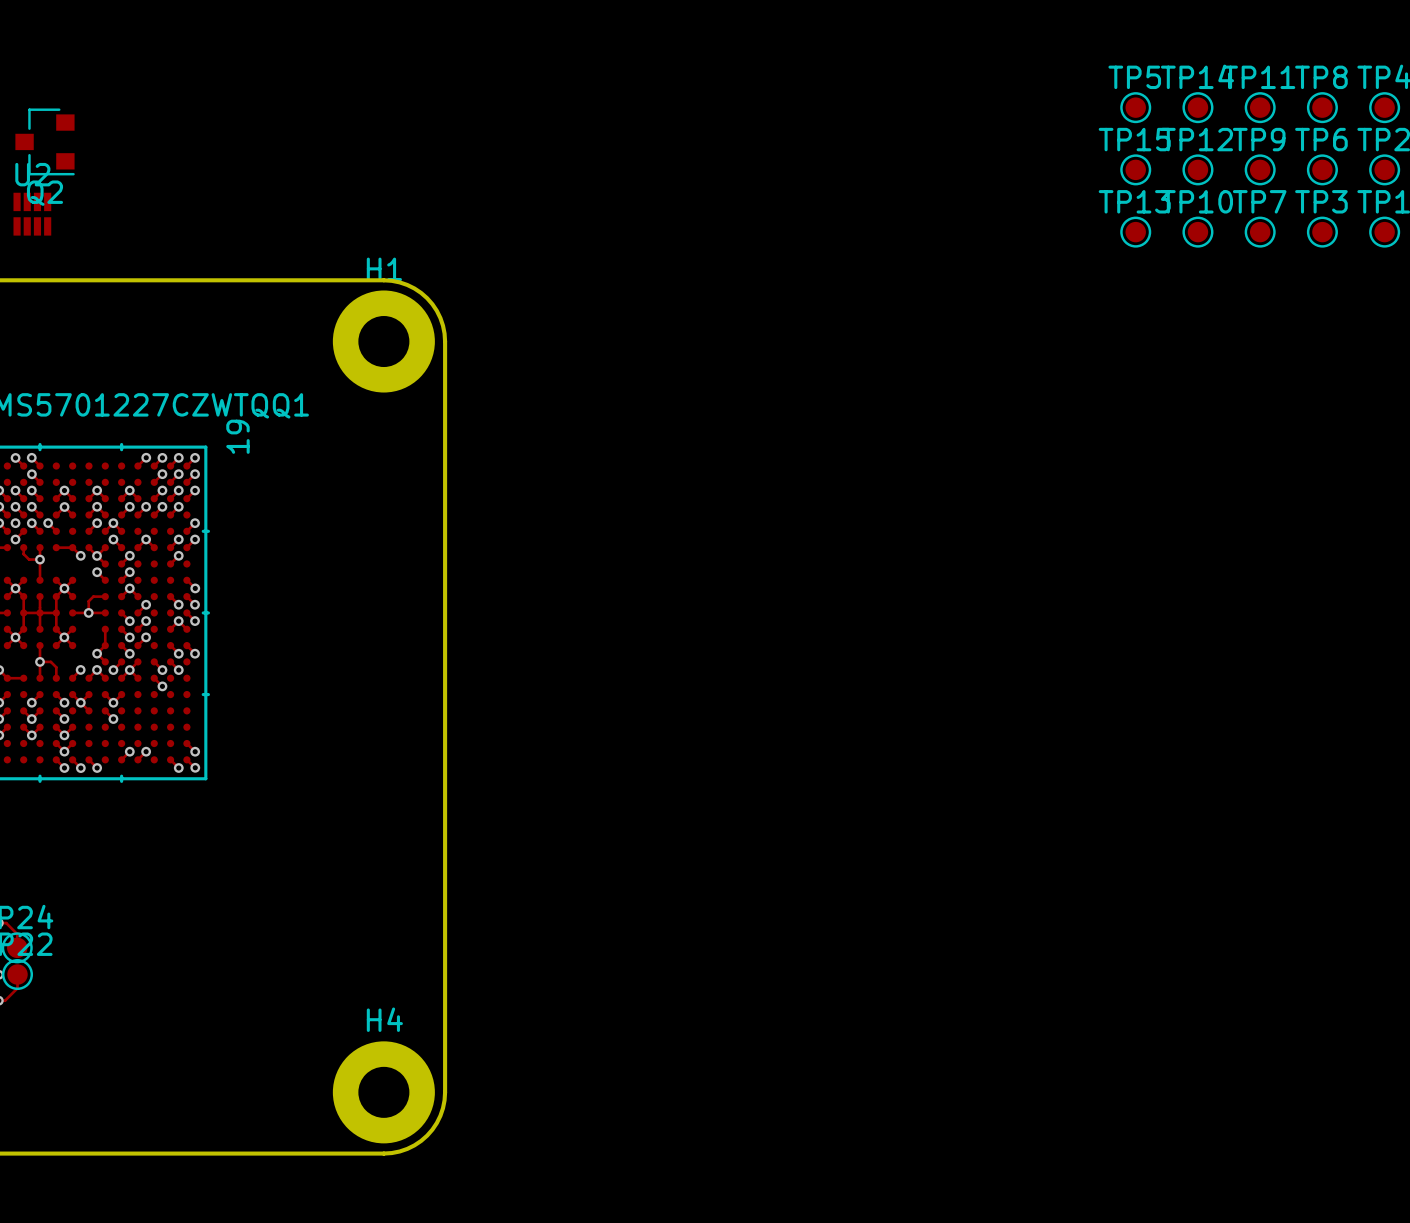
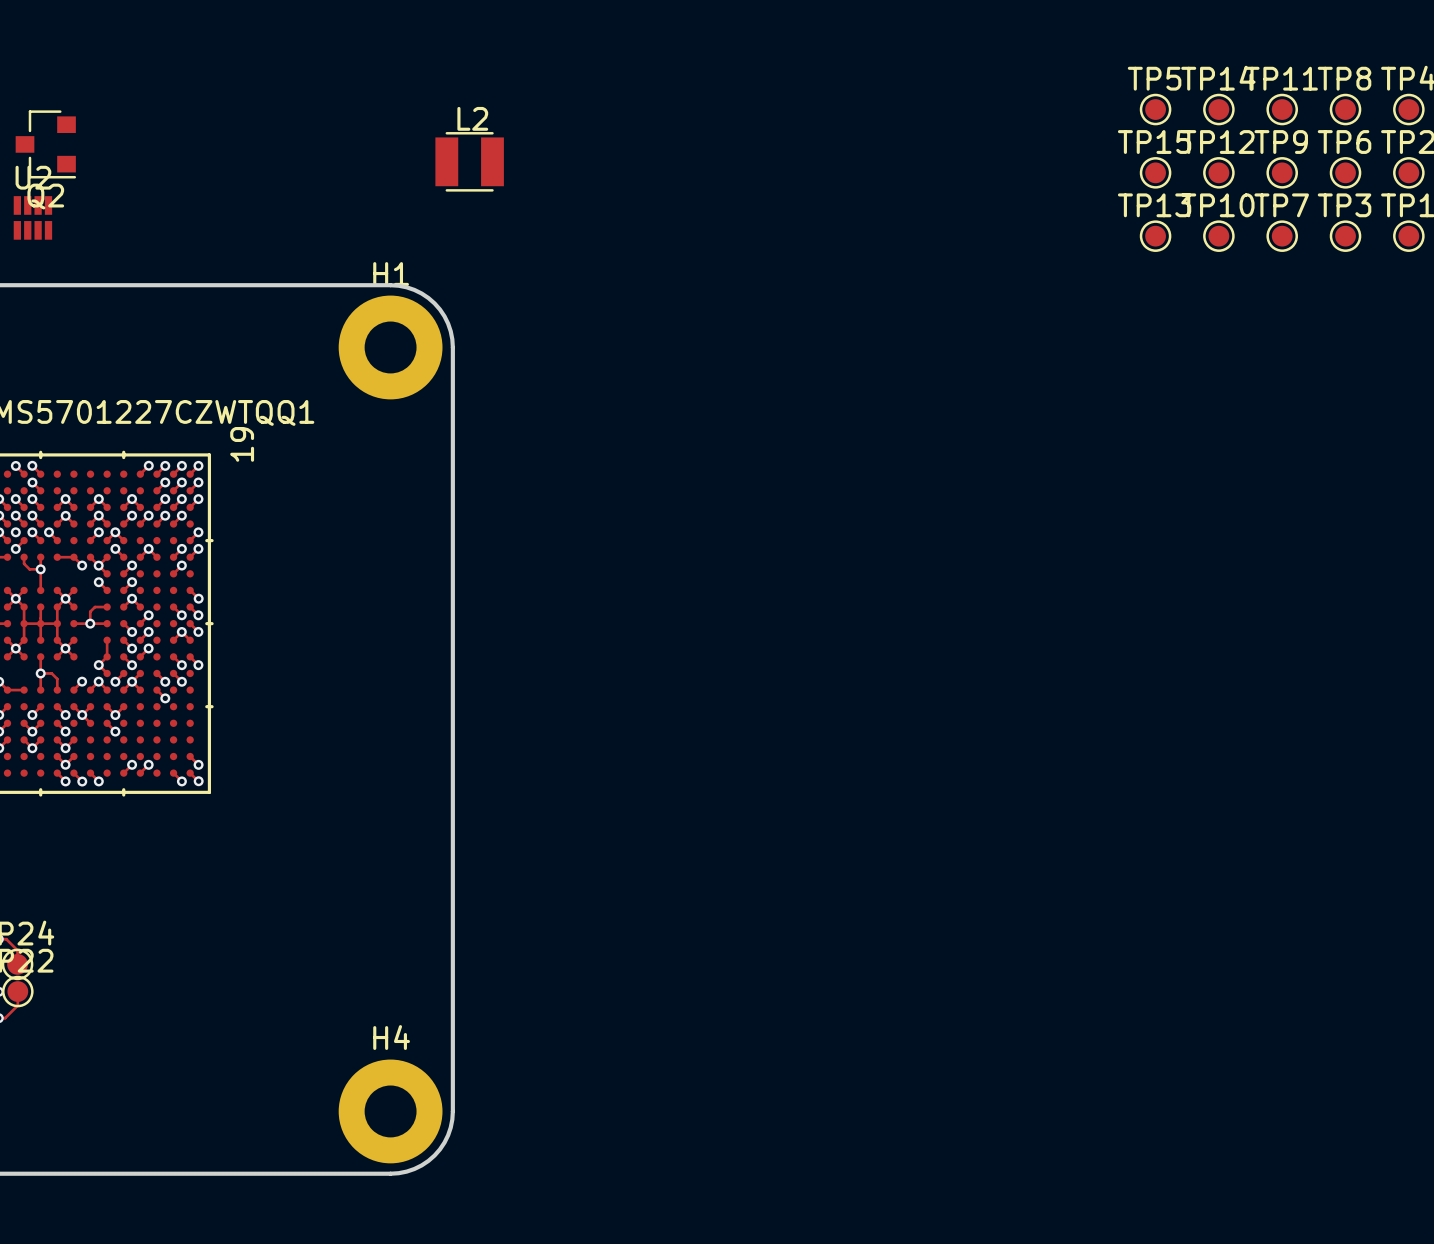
L2: none -> (469, 161)

